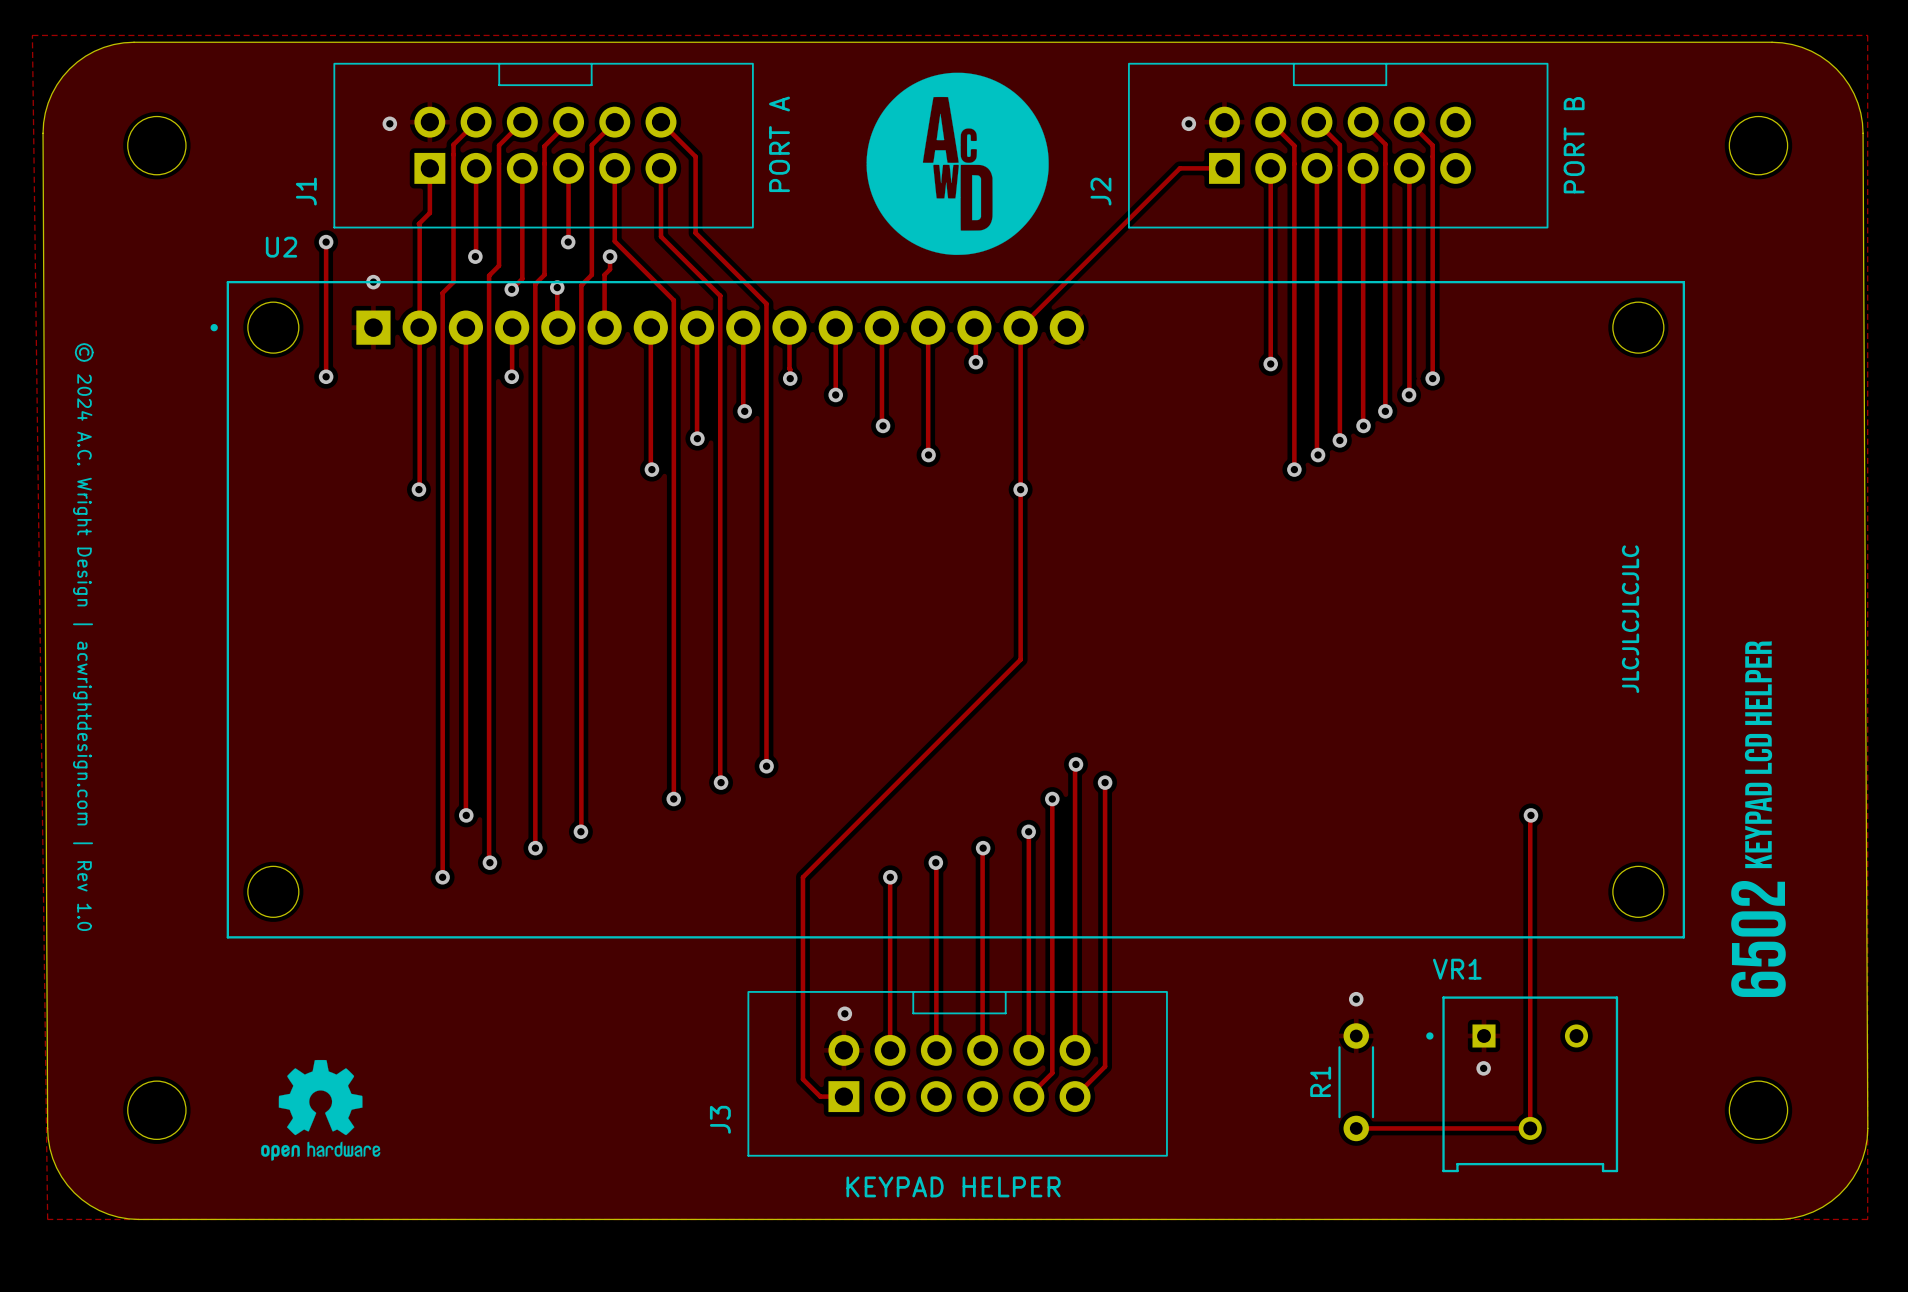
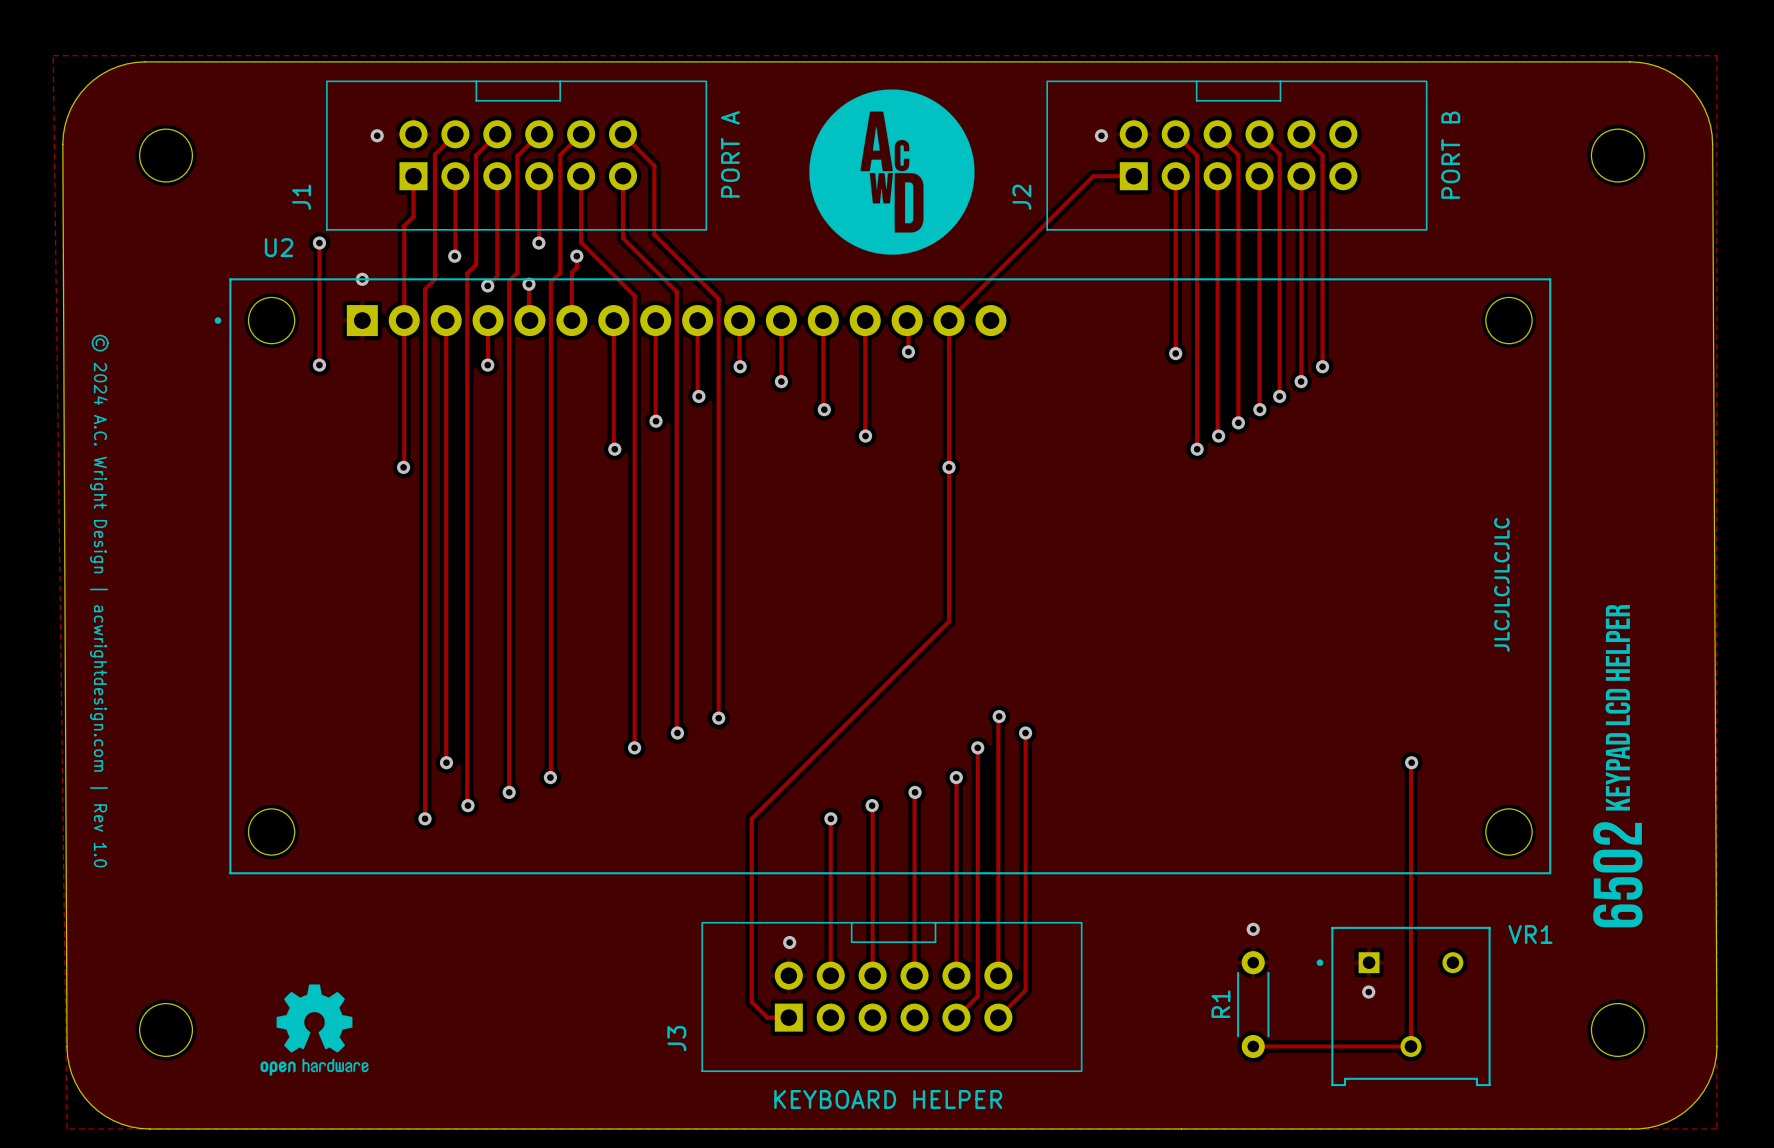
VR1 name position: VR1 (1457, 969) -> VR1 (1530, 934)
J3 value: KEYPAD HELPER (953, 1186) -> KEYBOARD HELPER (888, 1099)

